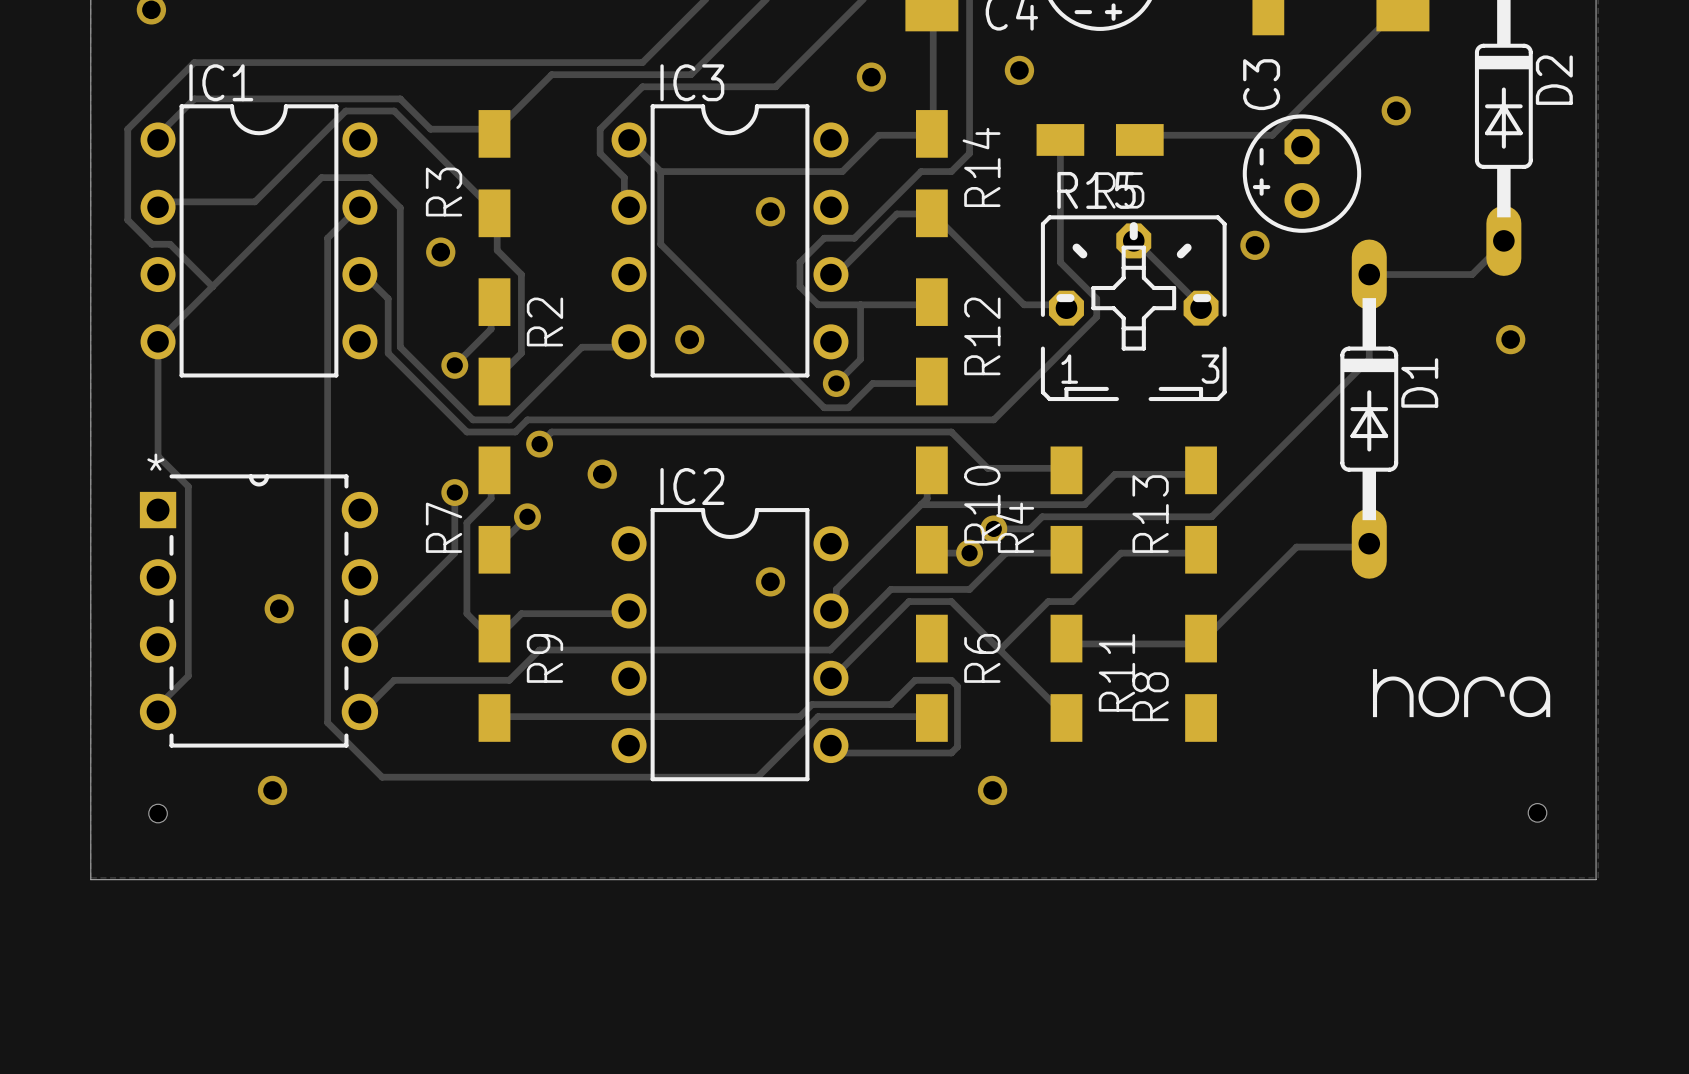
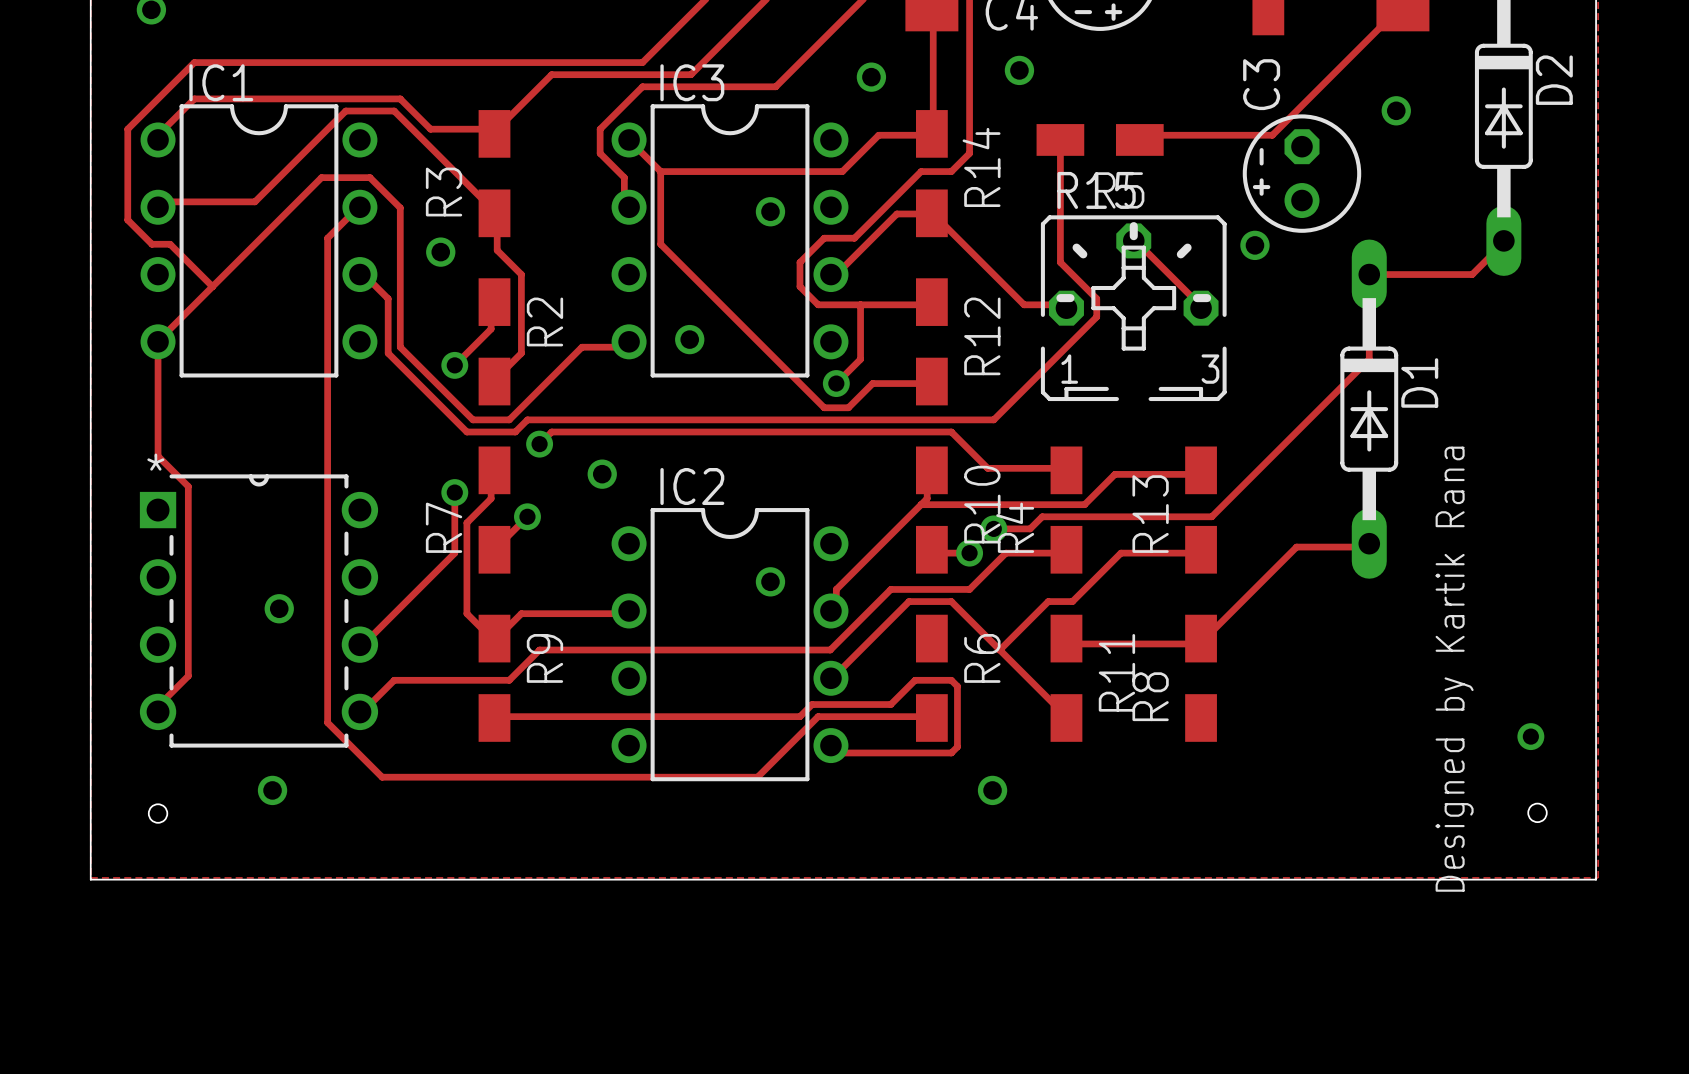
via: (1510, 339) -> none
drawing: [1372, 669, 1551, 718] -> none
text: none -> Designed by Kartik Rana (1454, 669)
via: none -> (1530, 736)

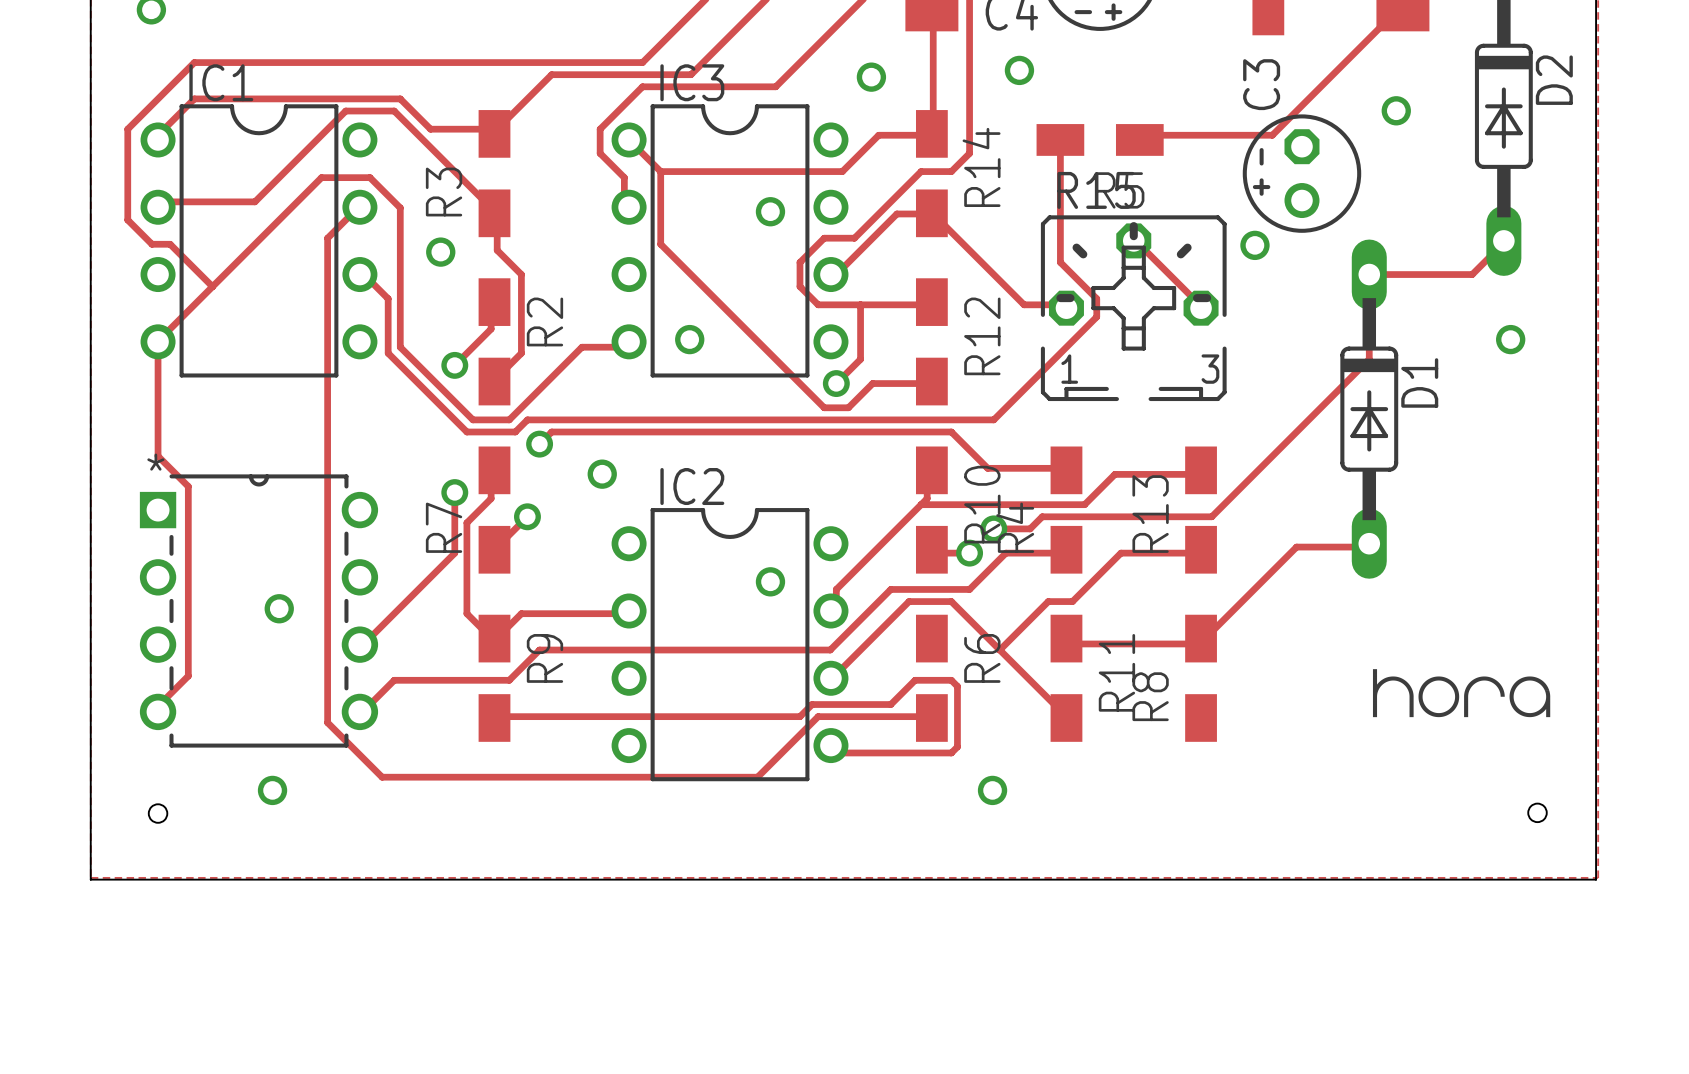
via: none -> (1510, 339)
drawing: none -> [1372, 669, 1551, 718]
text: Designed by Kartik Rana (1454, 669) -> none
via: (1530, 736) -> none

